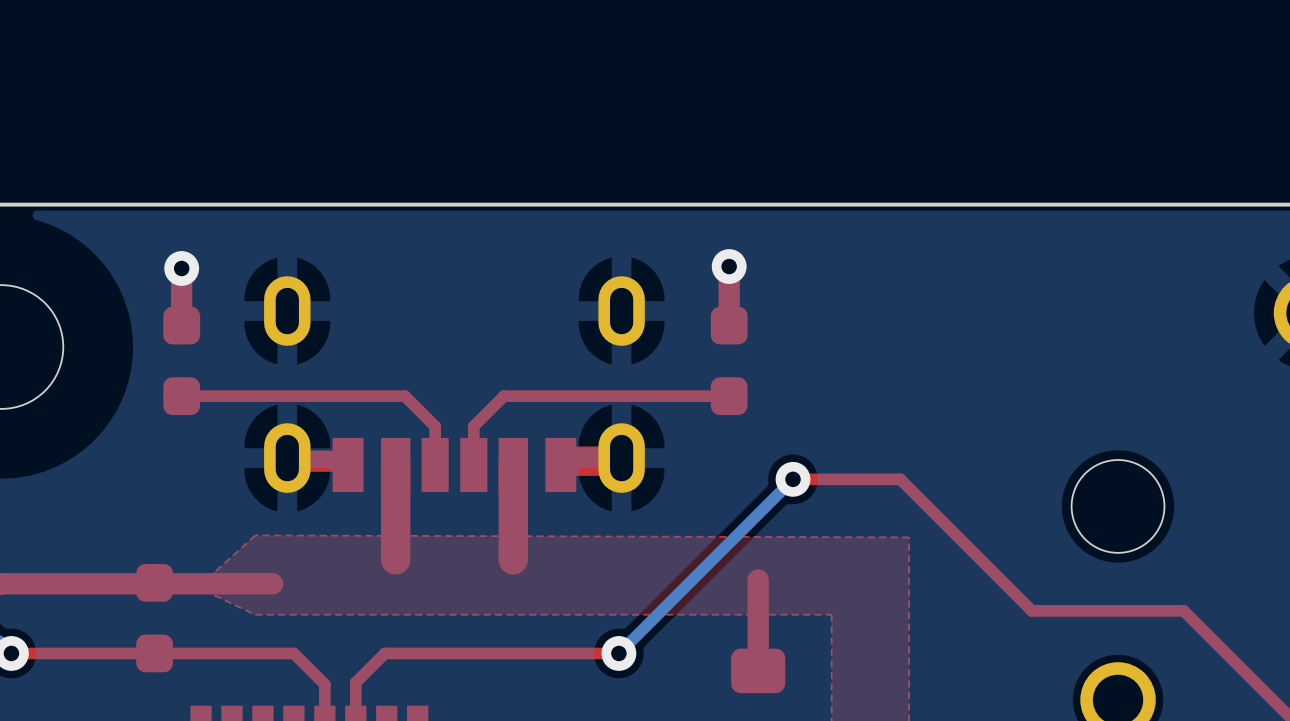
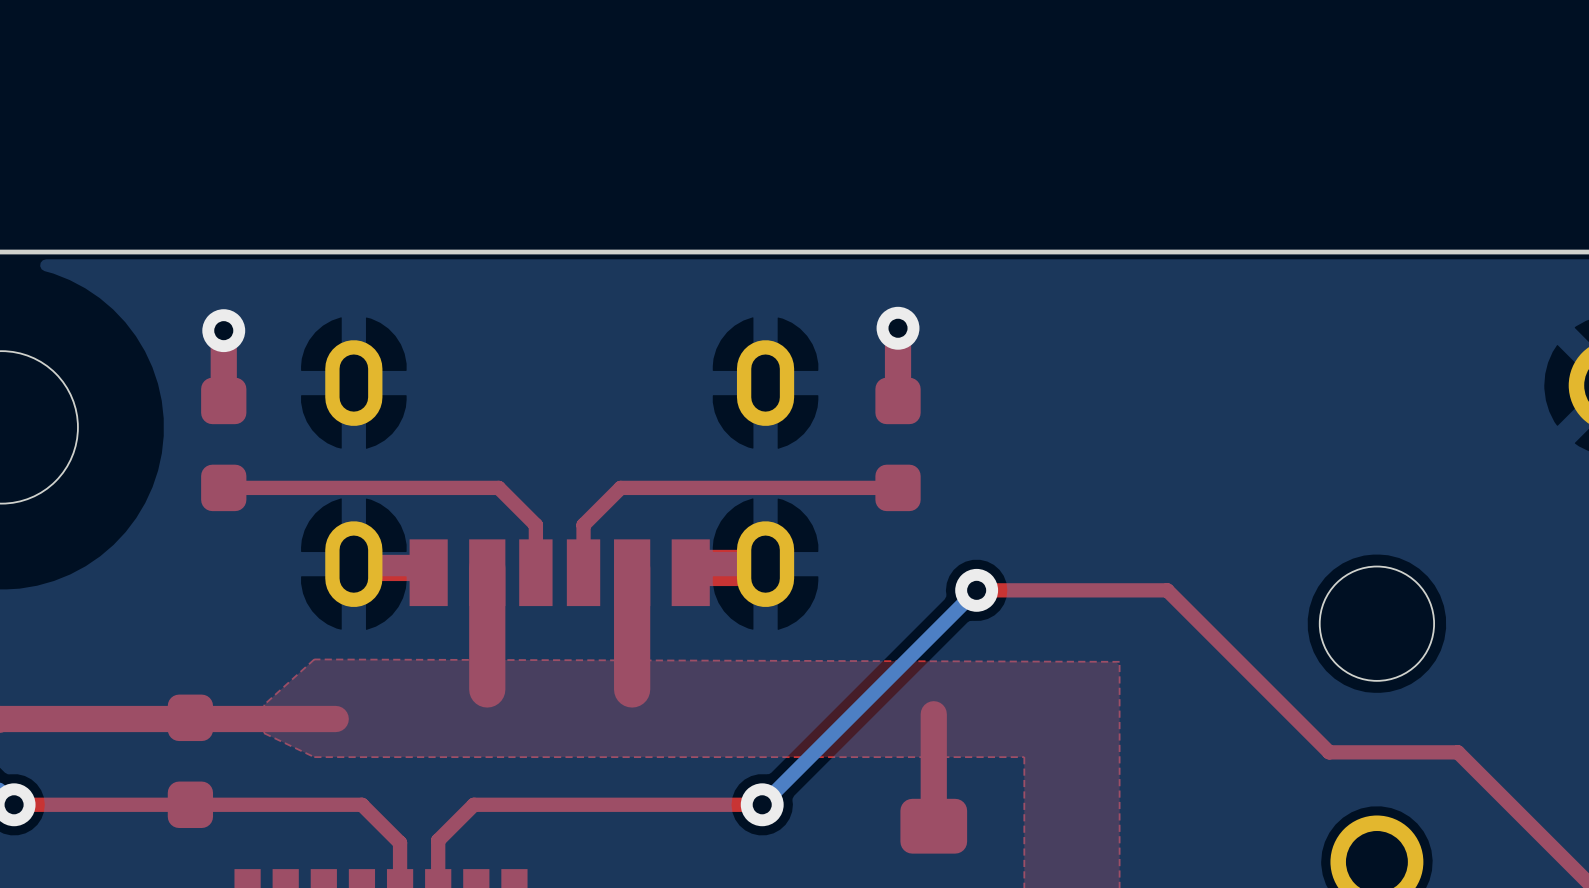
top track: (900, 479) (1031, 610) (1079, 610) -> (1108, 590) (1167, 590) (1329, 752)

